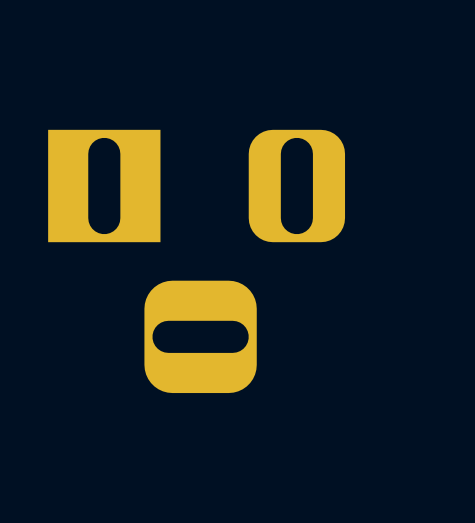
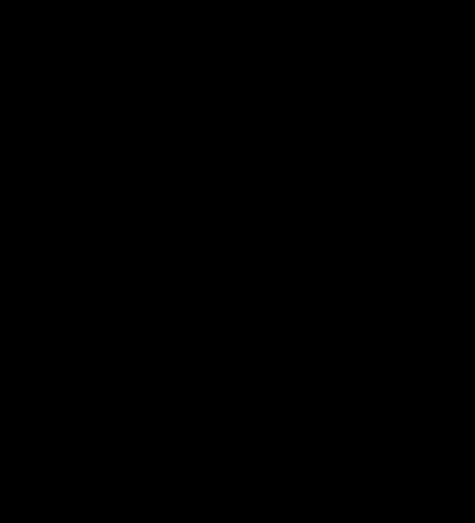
part: (196, 261) -> none

